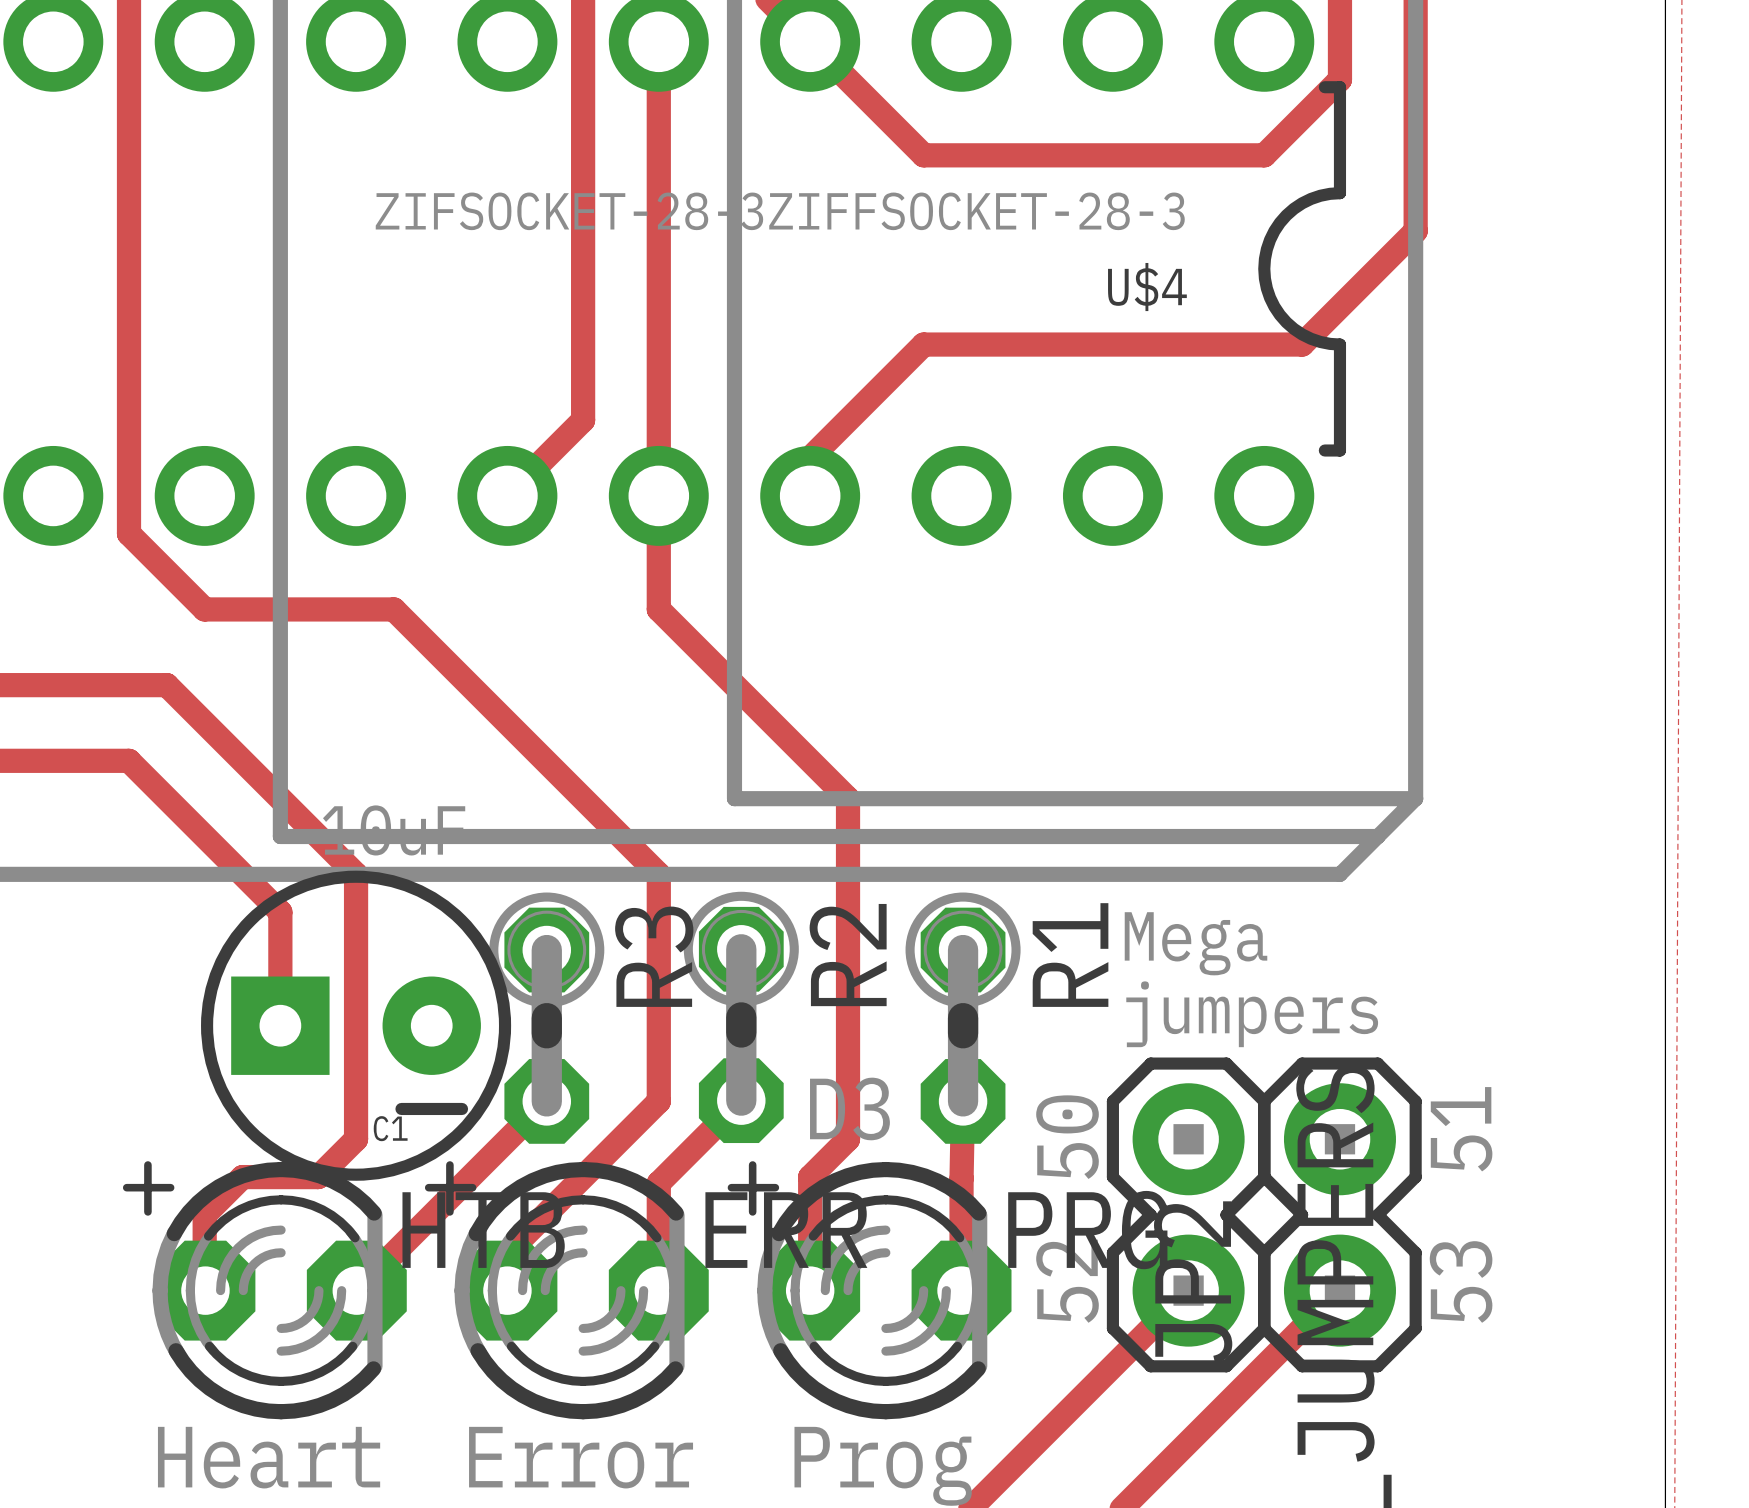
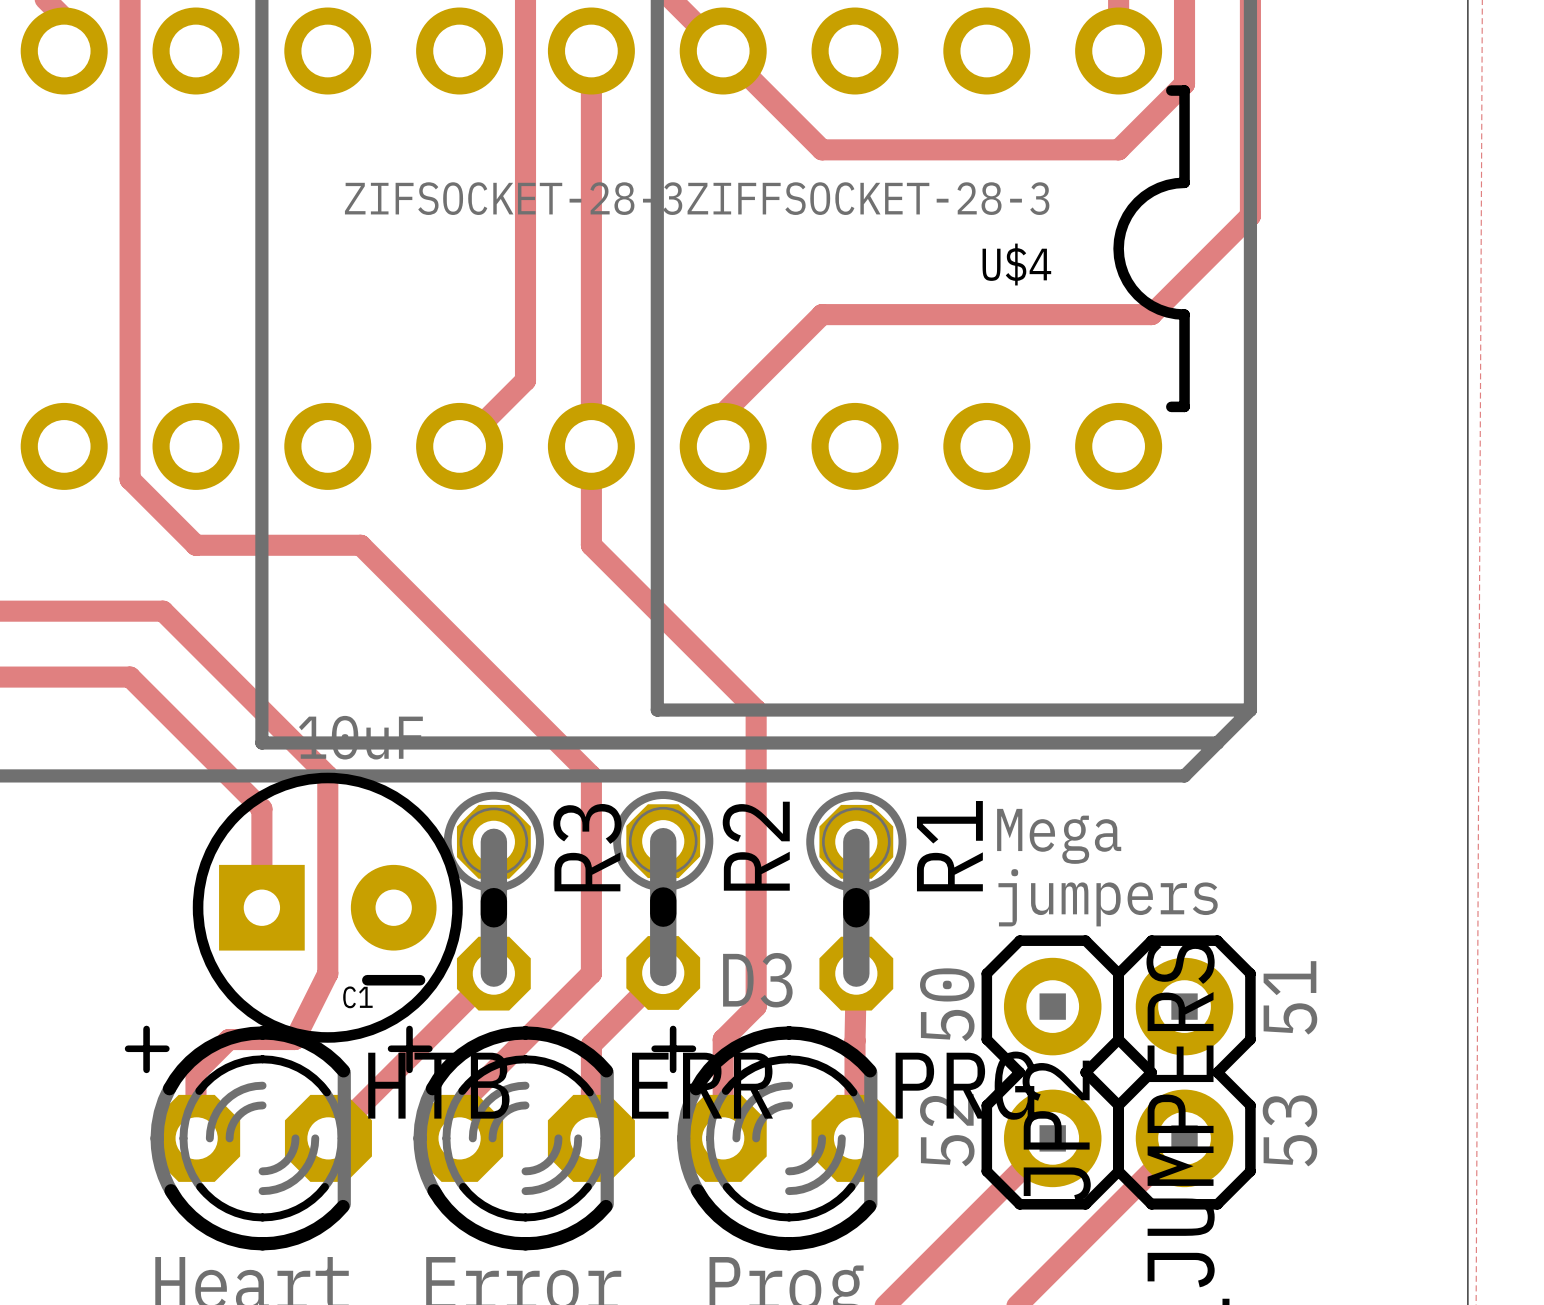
track: (356, 1101) (356, 1139) (318, 1177) -> (327, 973) (294, 1039)

